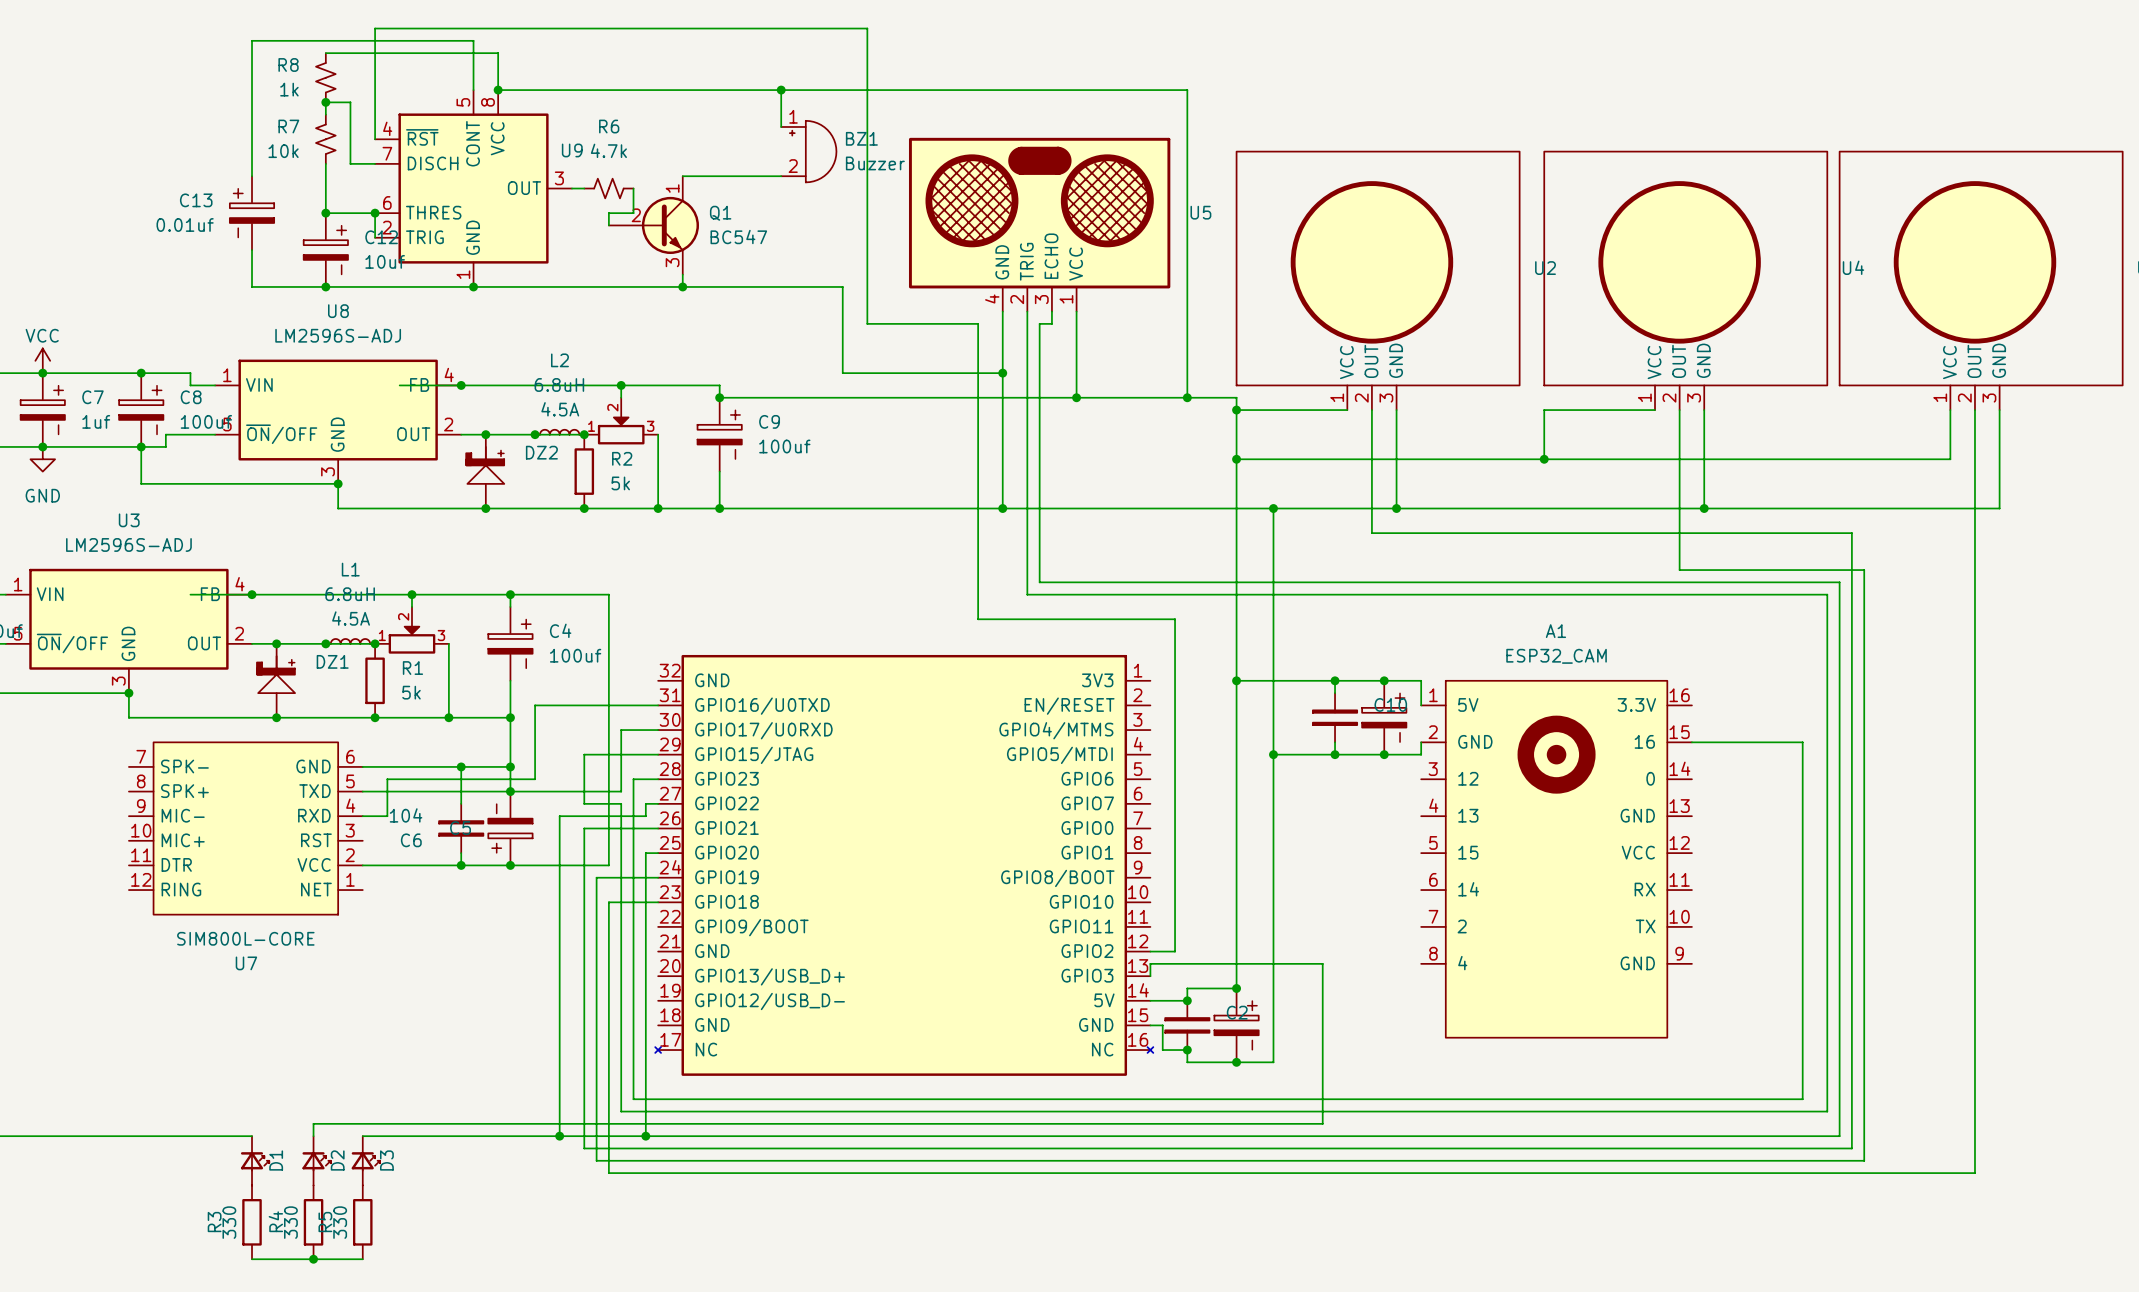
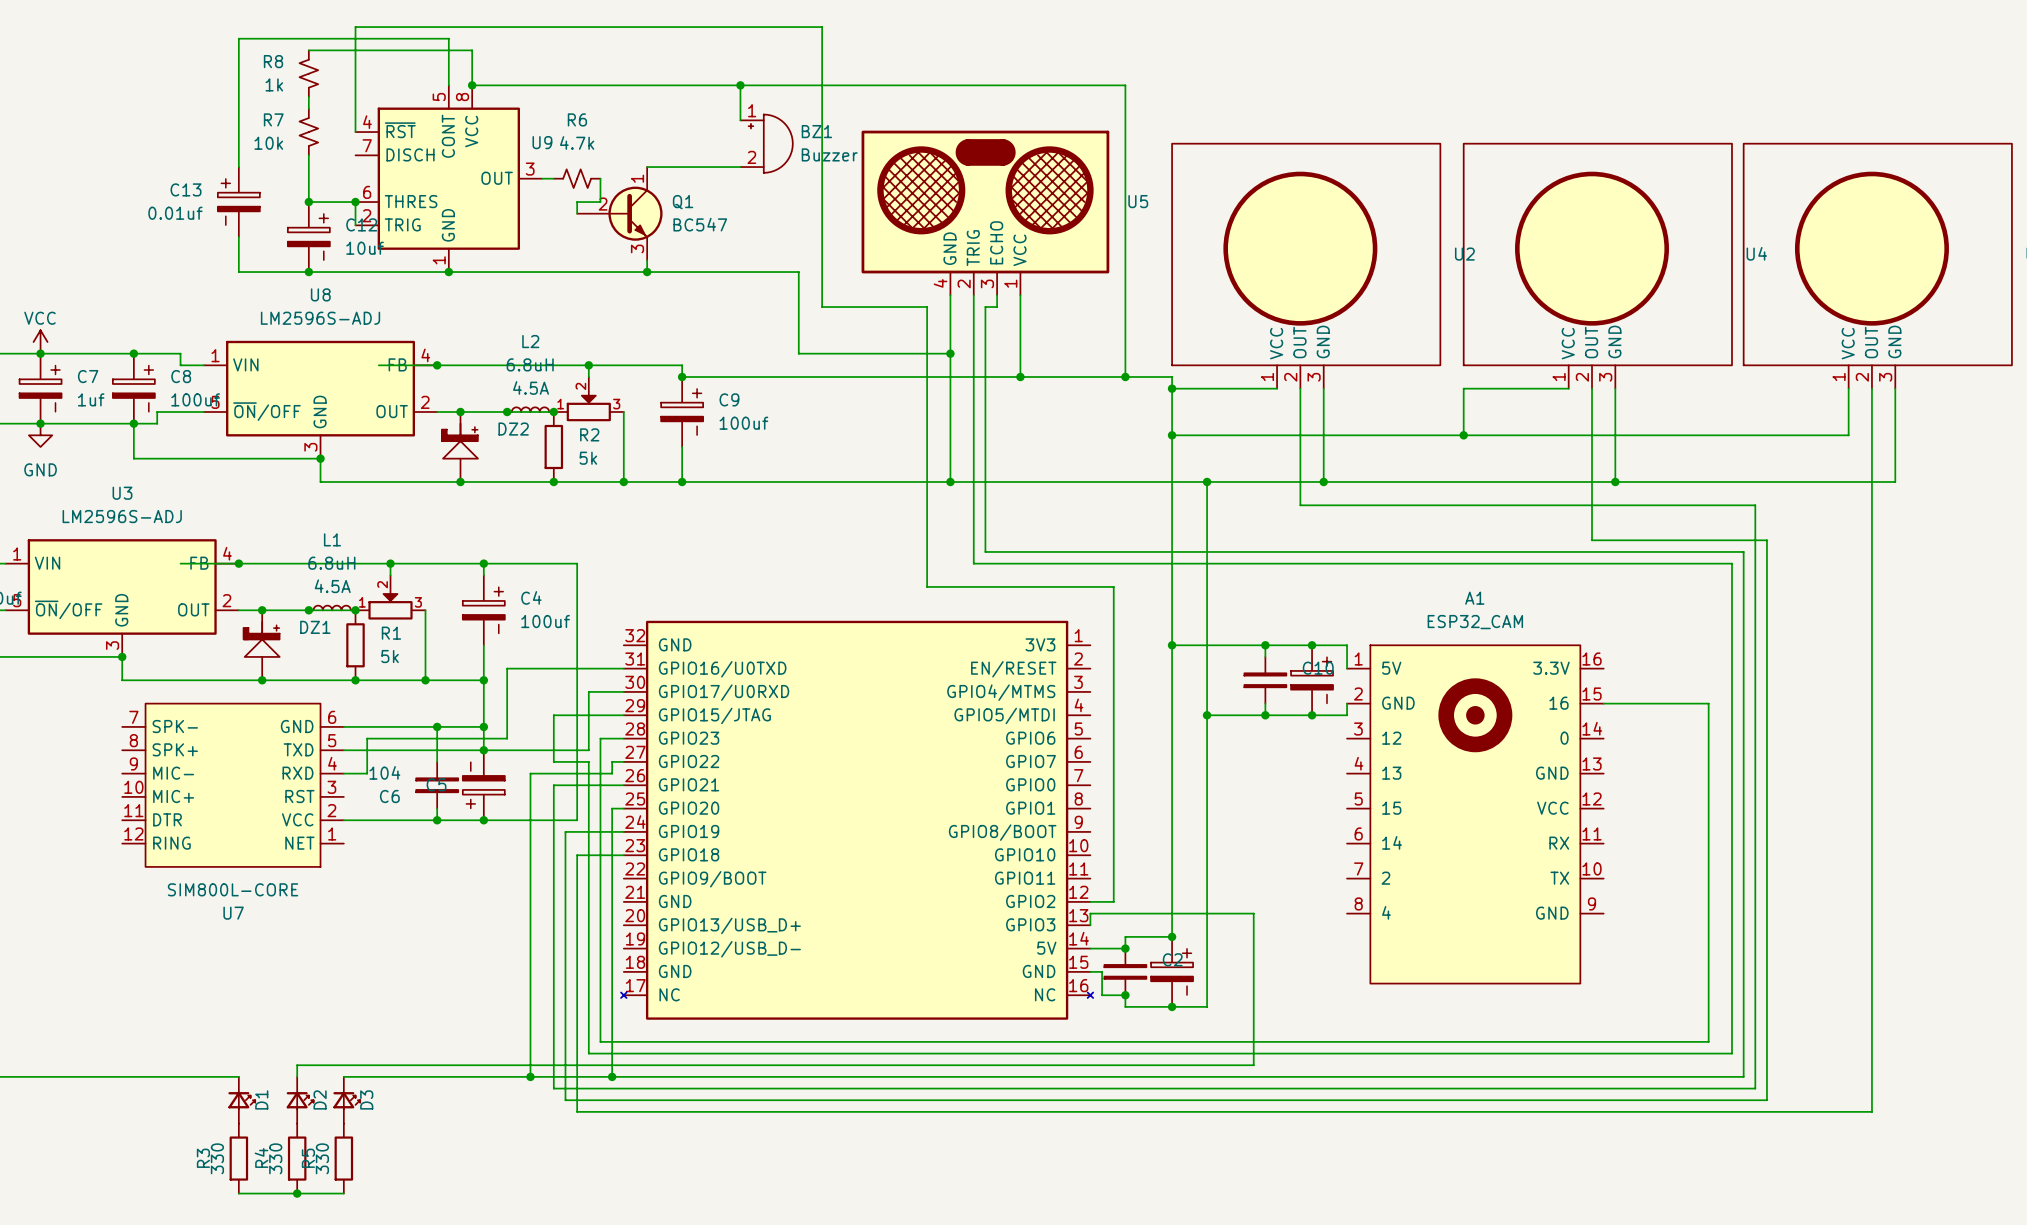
wire: (325, 102) (350, 102) (350, 163) (375, 163) -> none
junction: (325, 102) -> none

